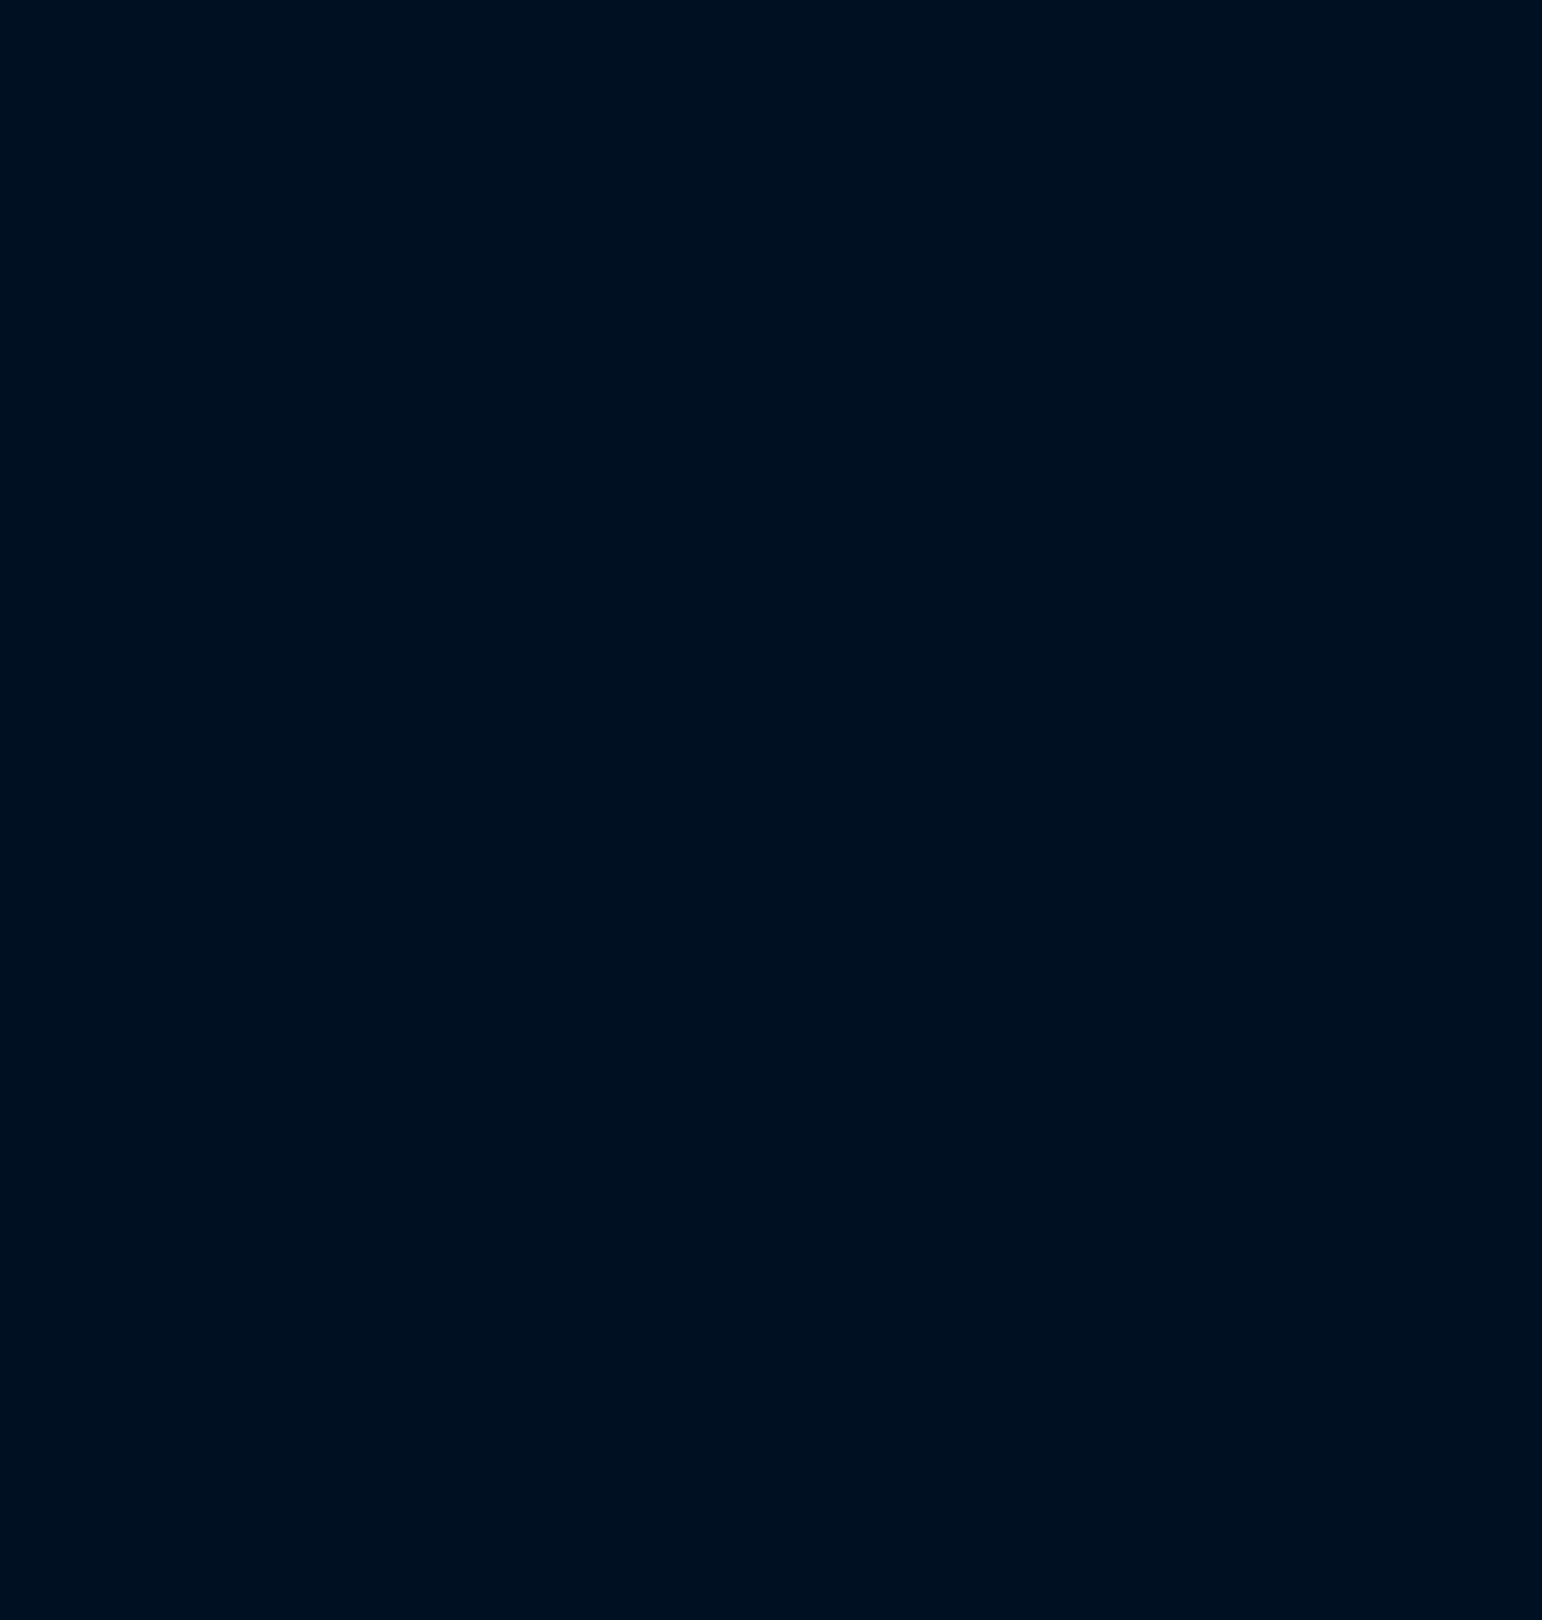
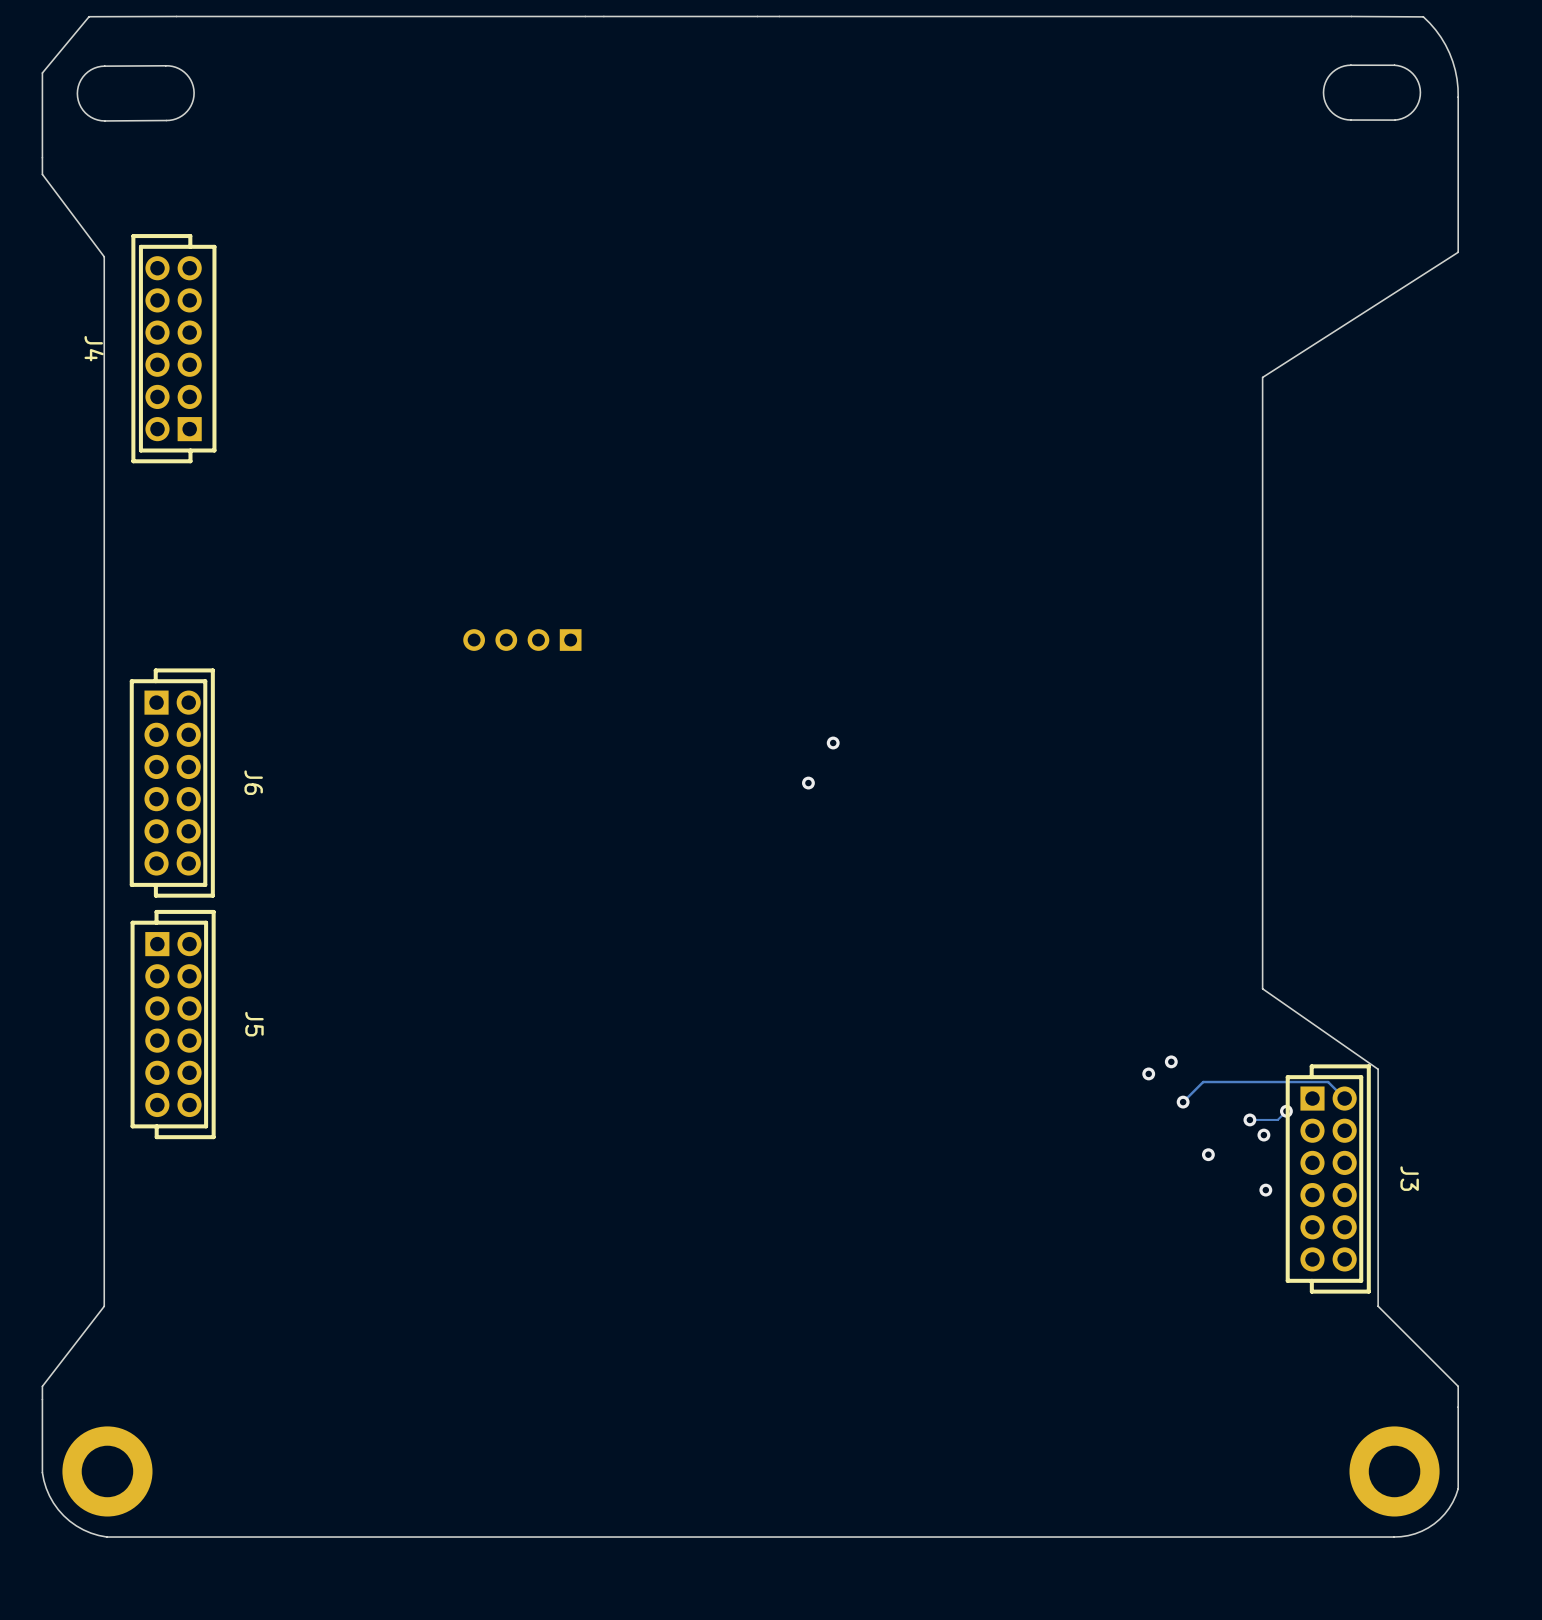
board edge: none -> (1351, 16) (89, 16) (42, 72) (42, 174) (104, 256) (104, 1306) (42, 1386) (43, 1480) (53, 1503) (69, 1521) (90, 1533) (106, 1537) (1393, 1537) (1408, 1535) (1421, 1531) (1434, 1523) (1444, 1514) (1452, 1502) (1458, 1488) (1458, 1386) (1378, 1306) (1378, 1069) (1262, 988) (1262, 377) (1458, 252) (1458, 88) (1455, 70) (1449, 53) (1441, 37) (1423, 16) (1351, 16)
board edge: none -> (165, 65) (104, 66) (94, 68) (85, 74) (79, 83) (77, 93) (79, 104) (88, 115) (101, 120) (166, 120) (179, 117) (187, 111) (192, 102) (193, 86) (188, 77) (181, 70) (165, 65)
board edge: none -> (1394, 65) (1347, 65) (1335, 70) (1328, 77) (1323, 89) (1324, 99) (1328, 108) (1338, 116) (1347, 119) (1395, 120) (1408, 115) (1418, 102) (1419, 85) (1410, 71) (1394, 65)
J4: none -> (173, 348)
part: none -> (522, 640)
via: none -> (833, 742)
J6: none -> (172, 783)
via: none -> (808, 783)
J5: none -> (173, 1024)
via: none -> (1171, 1061)
via: none -> (1148, 1073)
track: none -> (1344, 1098) (1328, 1082) (1203, 1082) (1183, 1102)
via: none -> (1183, 1102)
track: none -> (1286, 1111) (1277, 1119) (1249, 1119)
via: none -> (1286, 1111)
via: none -> (1249, 1119)
via: none -> (1263, 1135)
via: none -> (1208, 1154)
J3: none -> (1328, 1178)
via: none -> (1265, 1190)
part: none -> (107, 1471)
part: none -> (1394, 1471)

